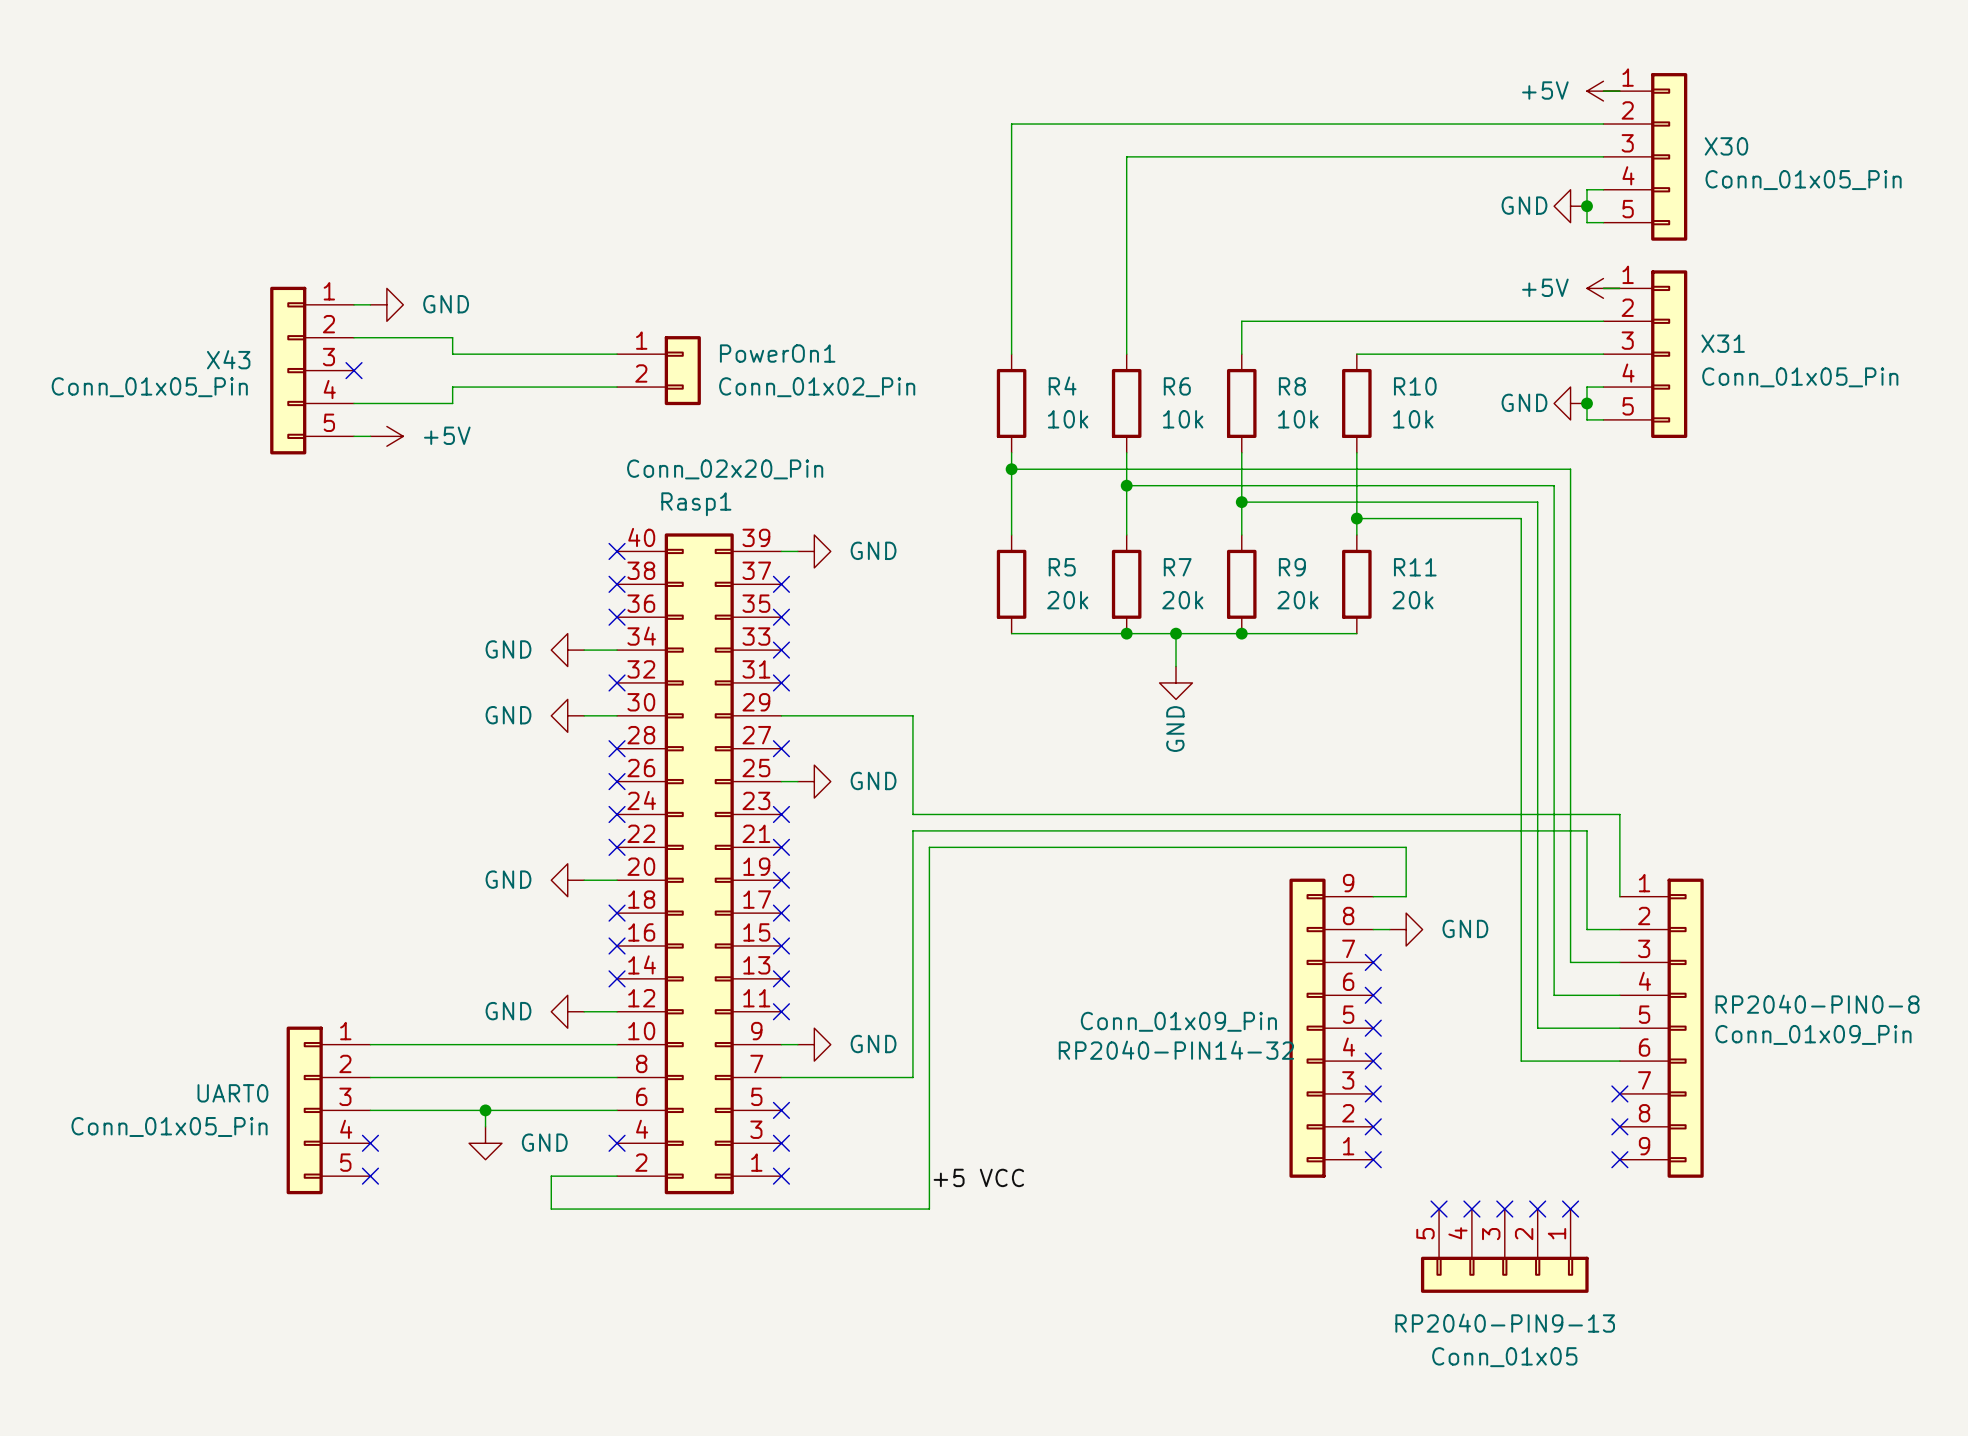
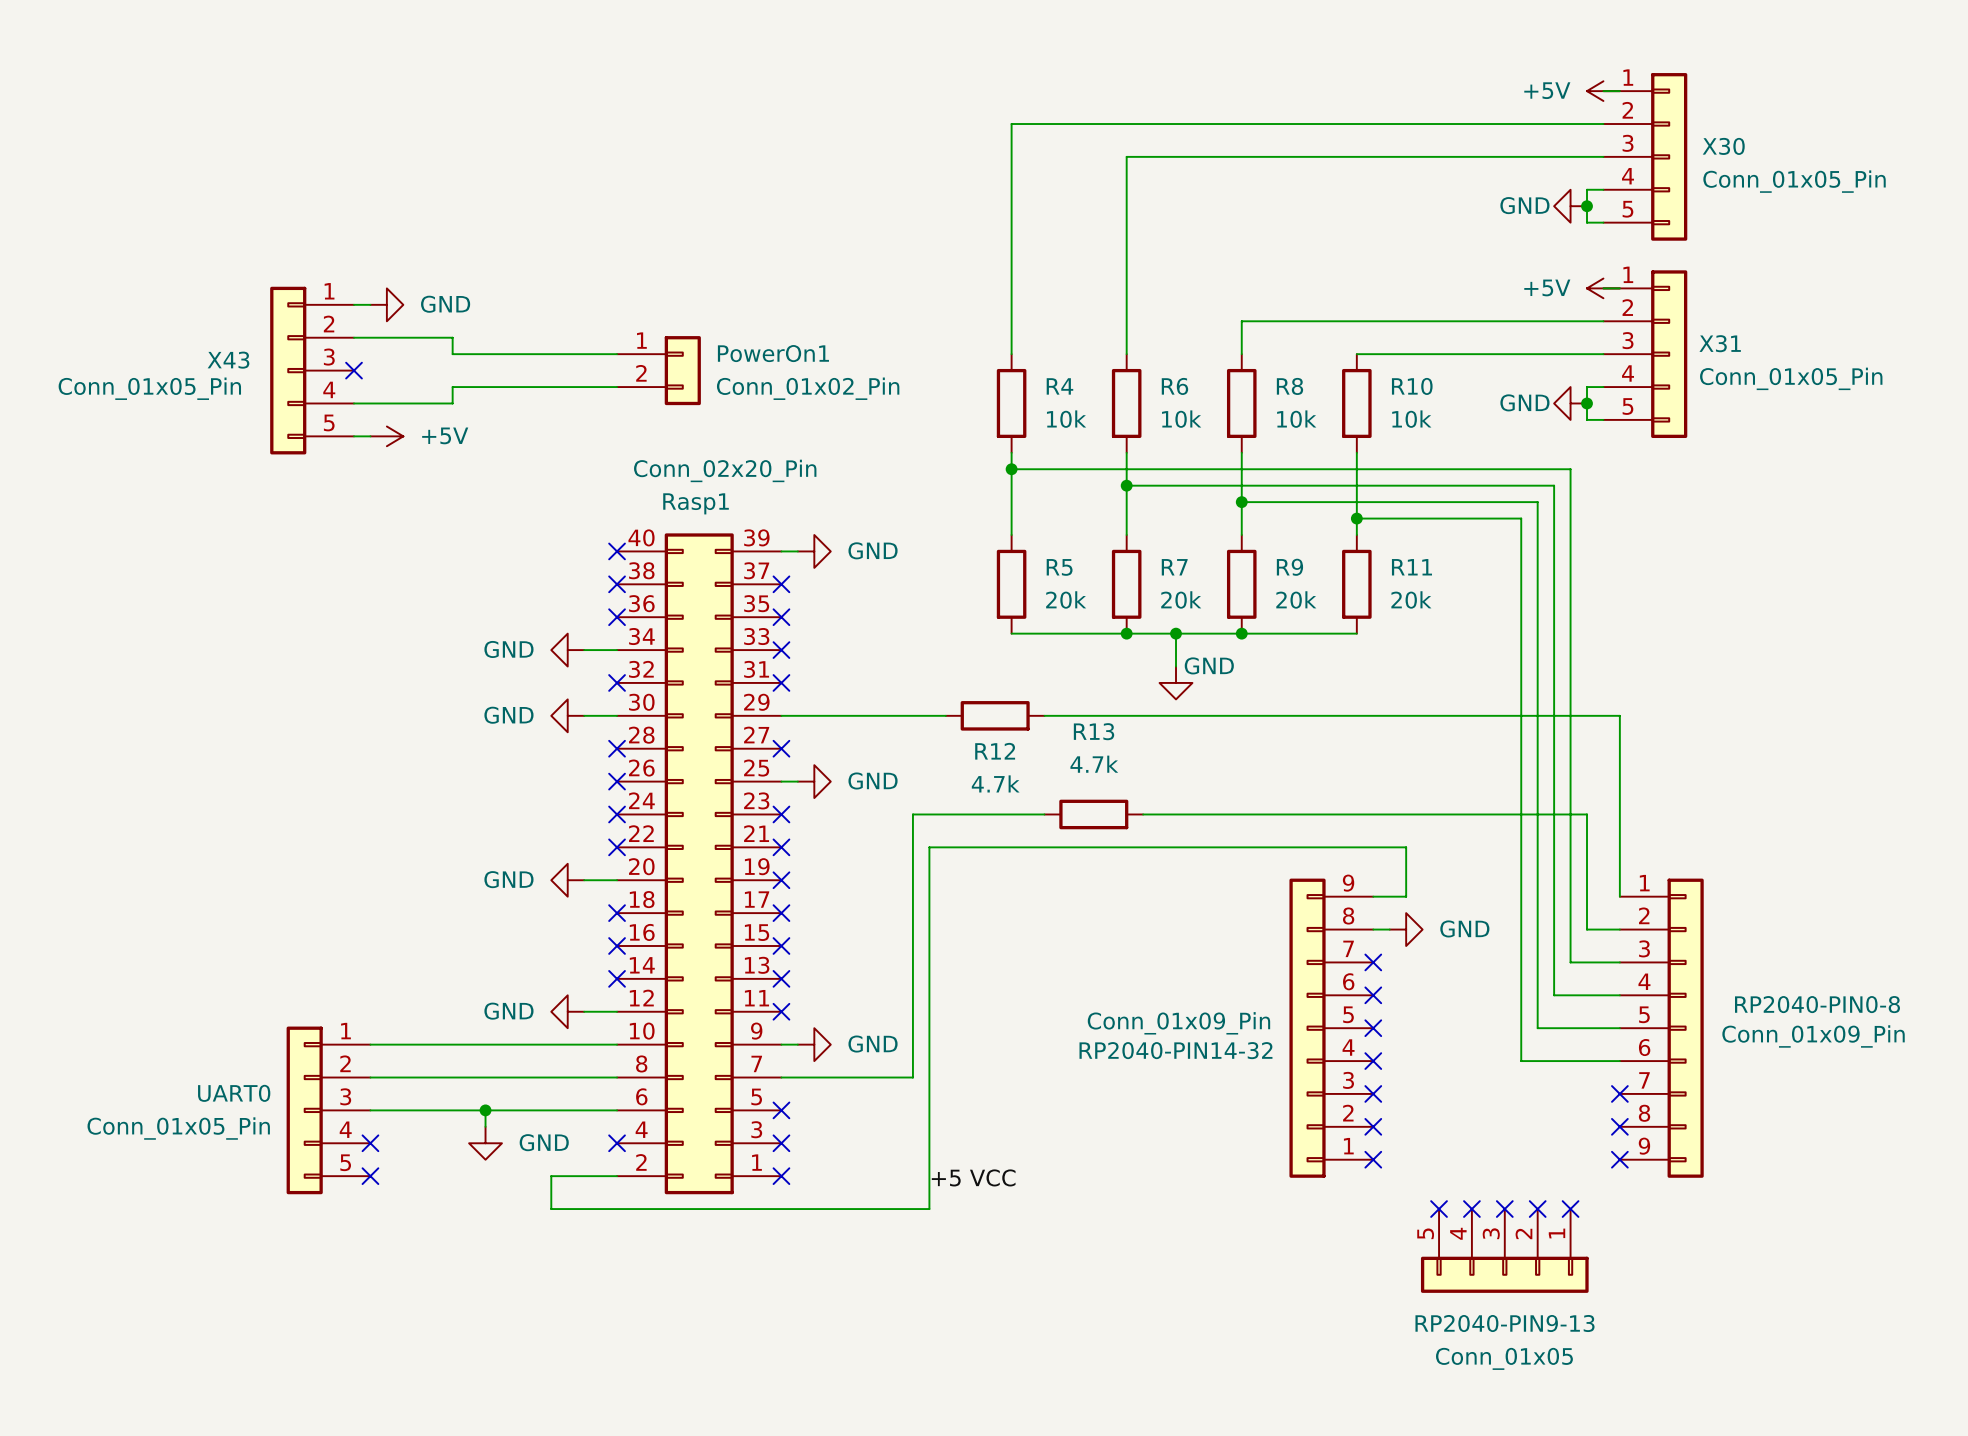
wire: (912, 715) (912, 814) -> (912, 715) (945, 715)
R12: none -> 4.7k (995, 715)
wire: none -> (1044, 715) (1619, 715) (1619, 814)
power symbol text rotation: 0° (1175, 729) -> 90° clockwise (1209, 665)
power symbol text position: GND (1175, 729) -> GND (1209, 665)
wire: (1044, 814) (1143, 814) -> none
R13: none -> 4.7k (1093, 814)
wire: (1587, 814) (1619, 814) -> (1587, 814) (1587, 830)
wire: (912, 830) (1587, 830) -> (912, 830) (912, 814)

